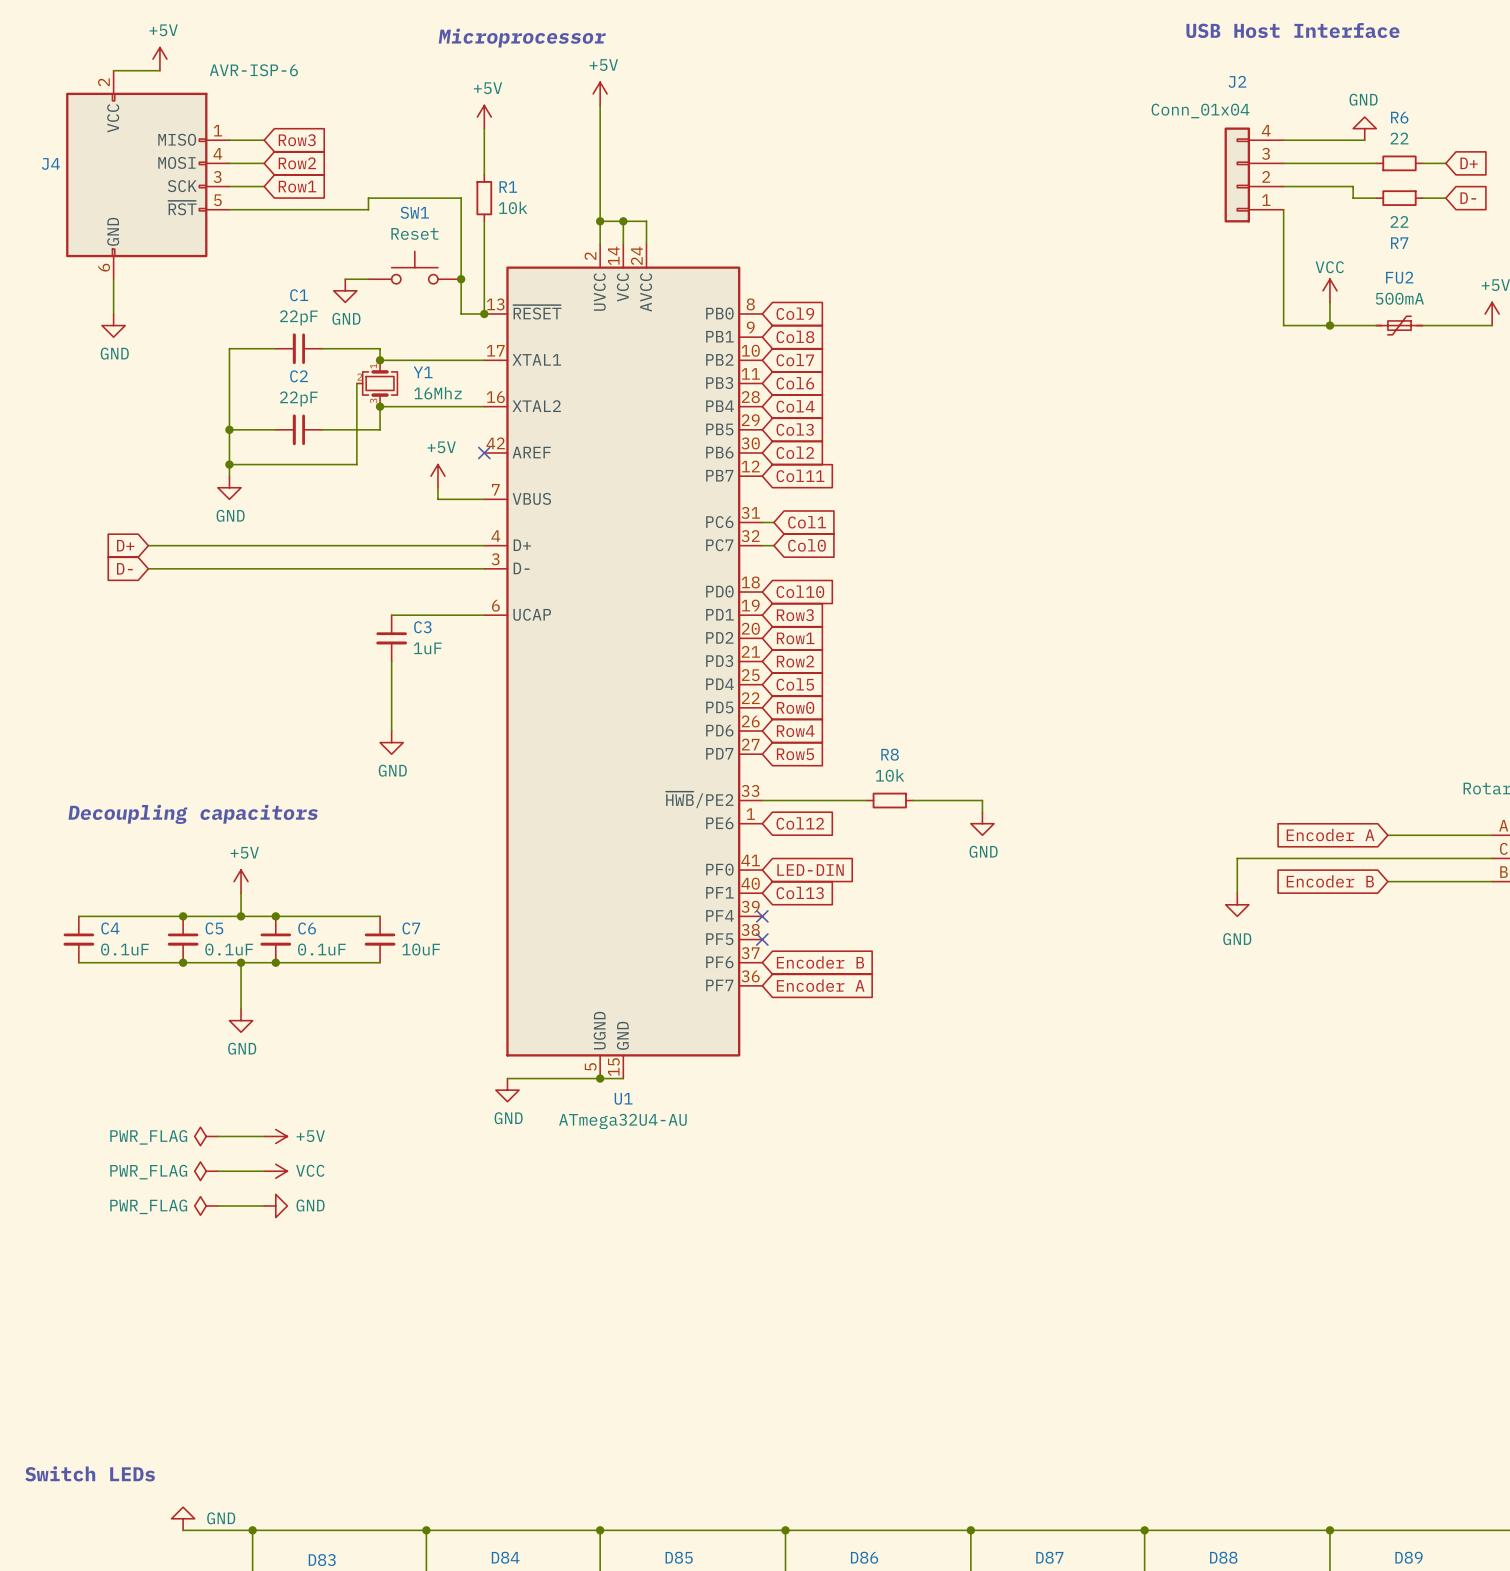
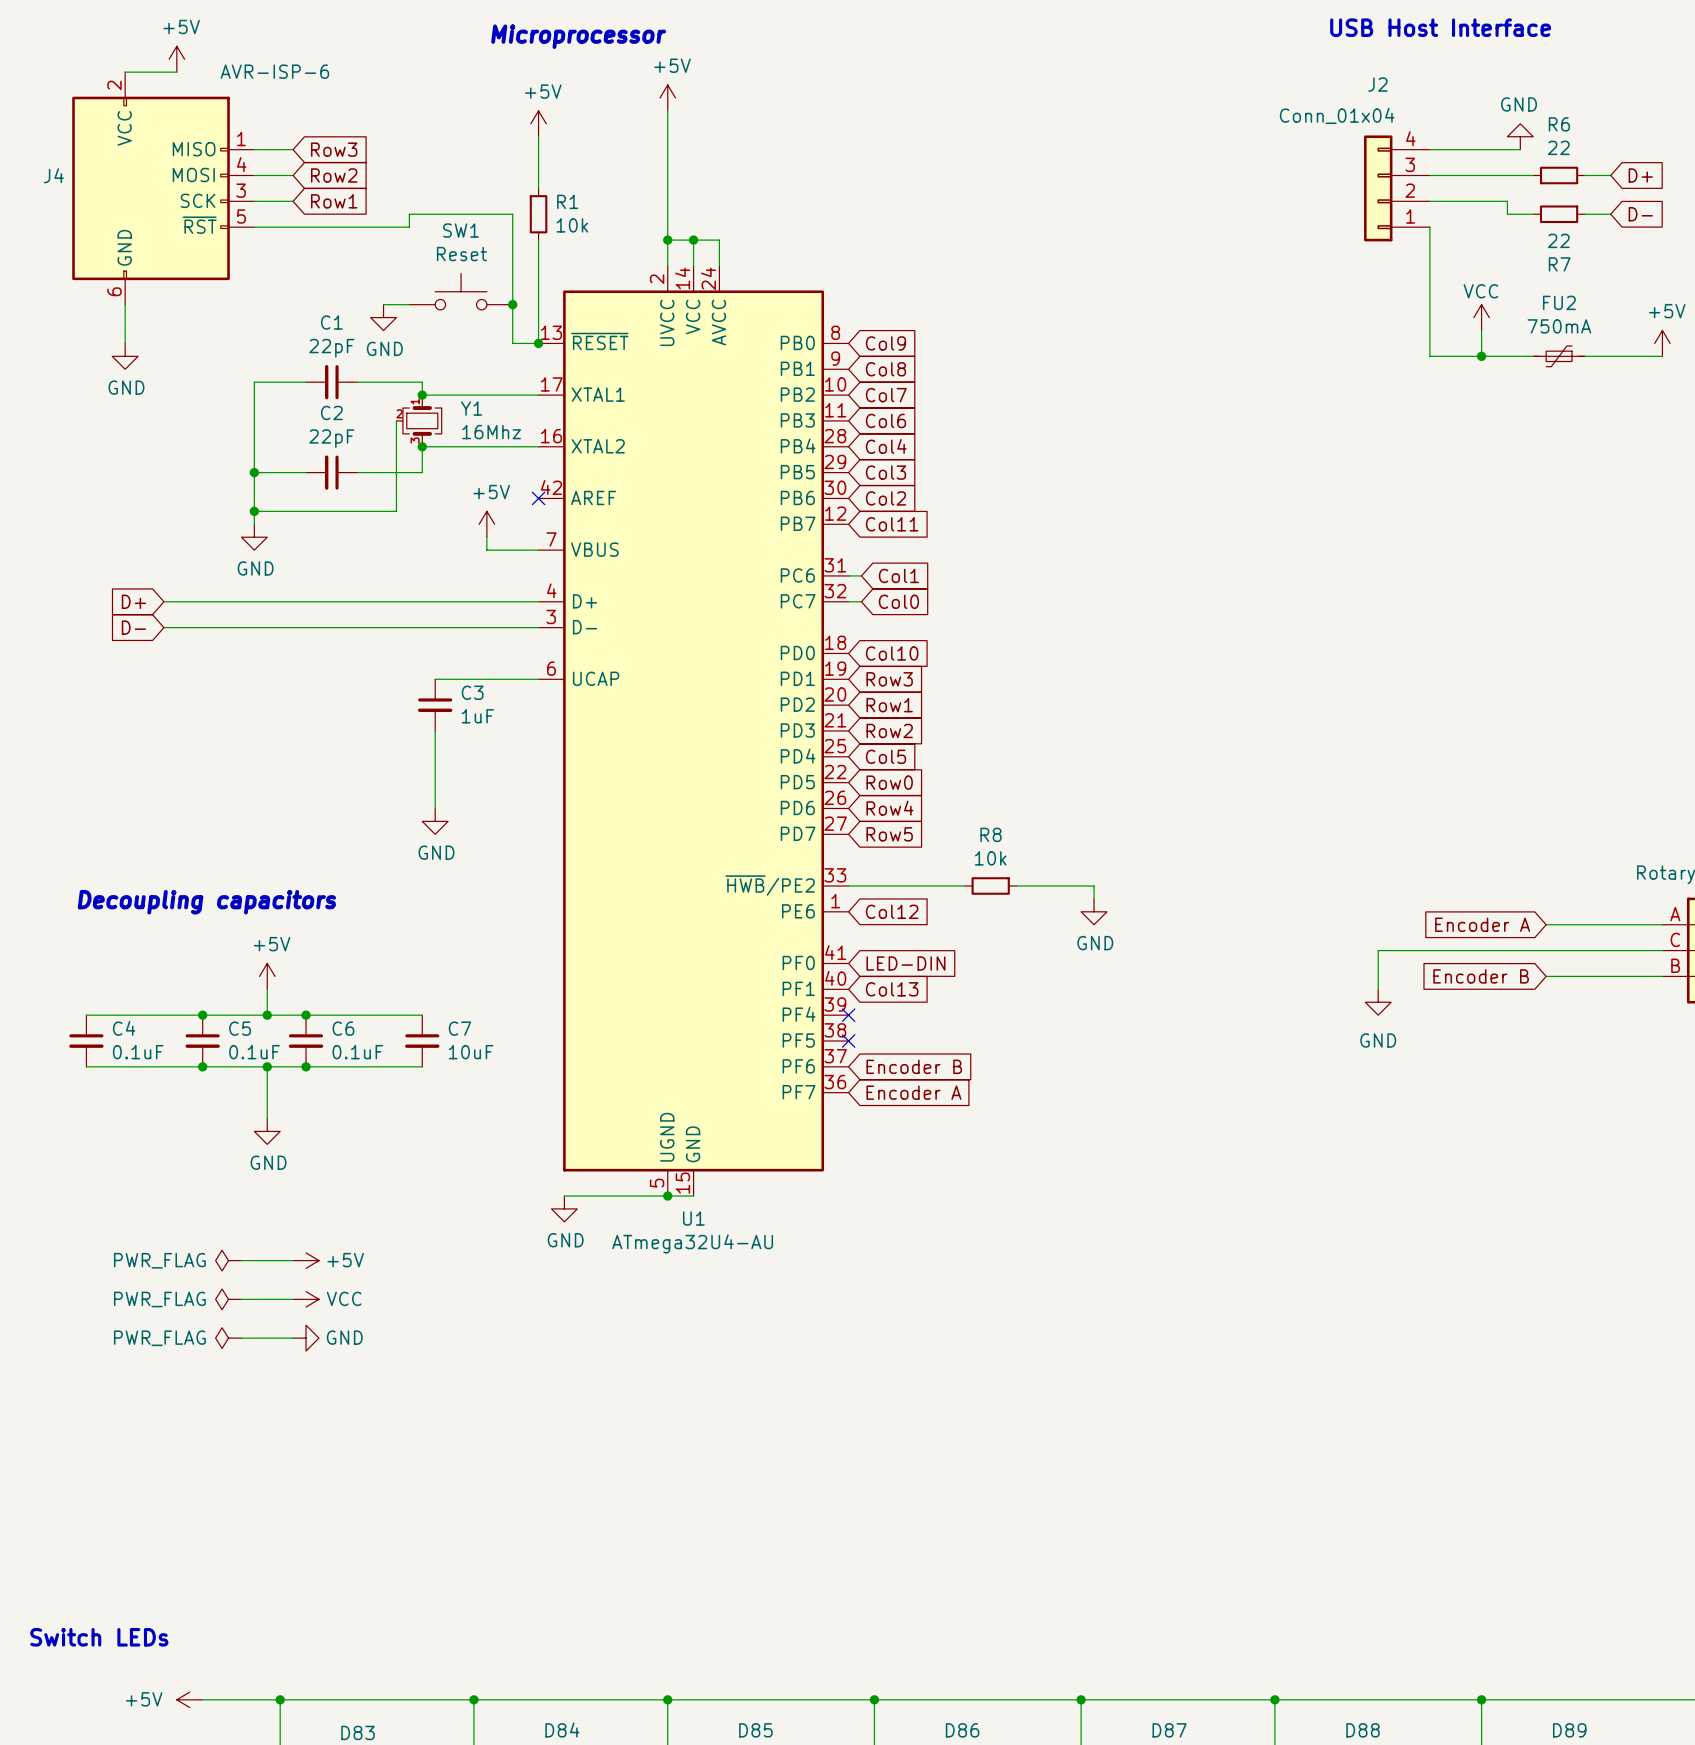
FU2 value: 500mA (1399, 298) -> 750mA (1559, 326)
power symbol: GND (183, 1518) -> none
power symbol: none -> +5V (189, 1699)

